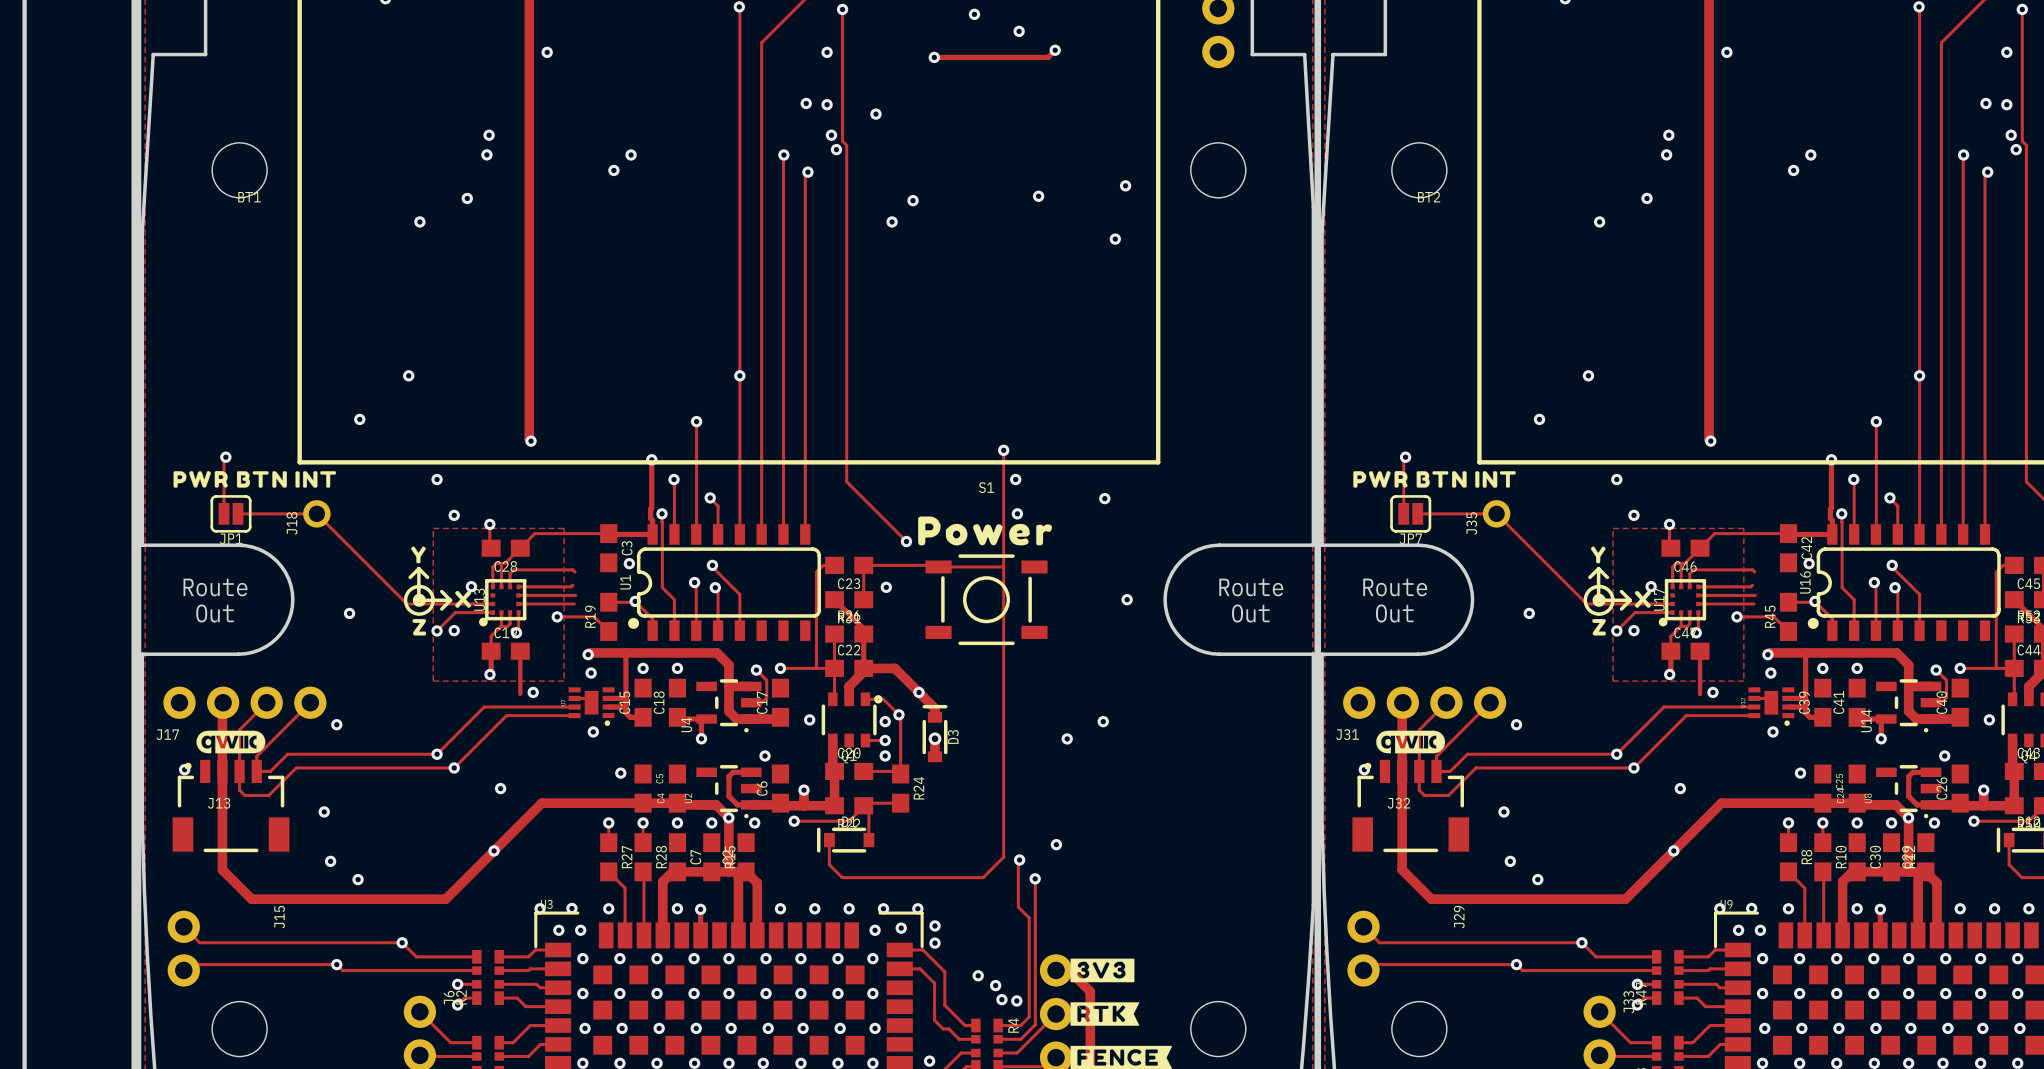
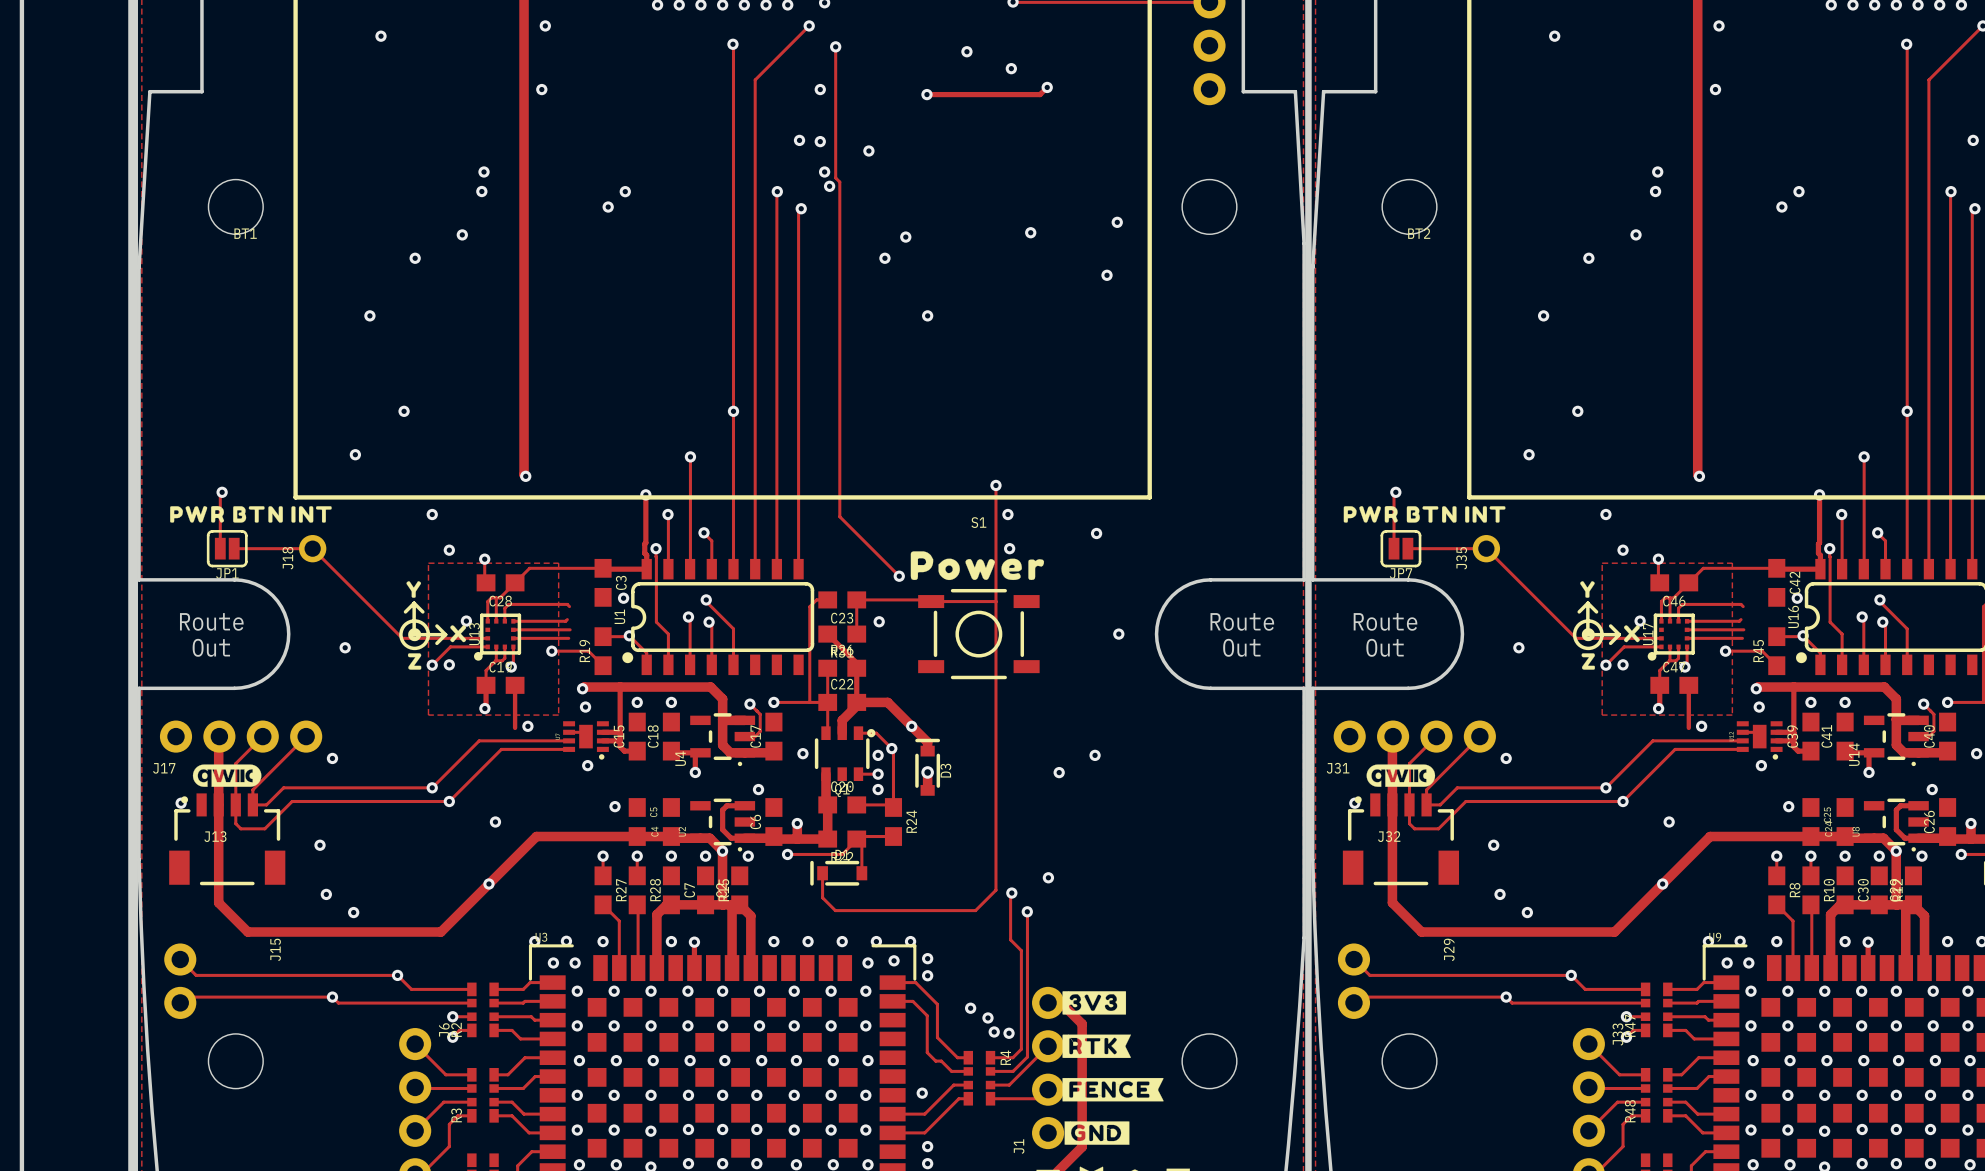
via: none -> (369, 315)
via: none -> (927, 315)
via: none -> (1543, 315)

